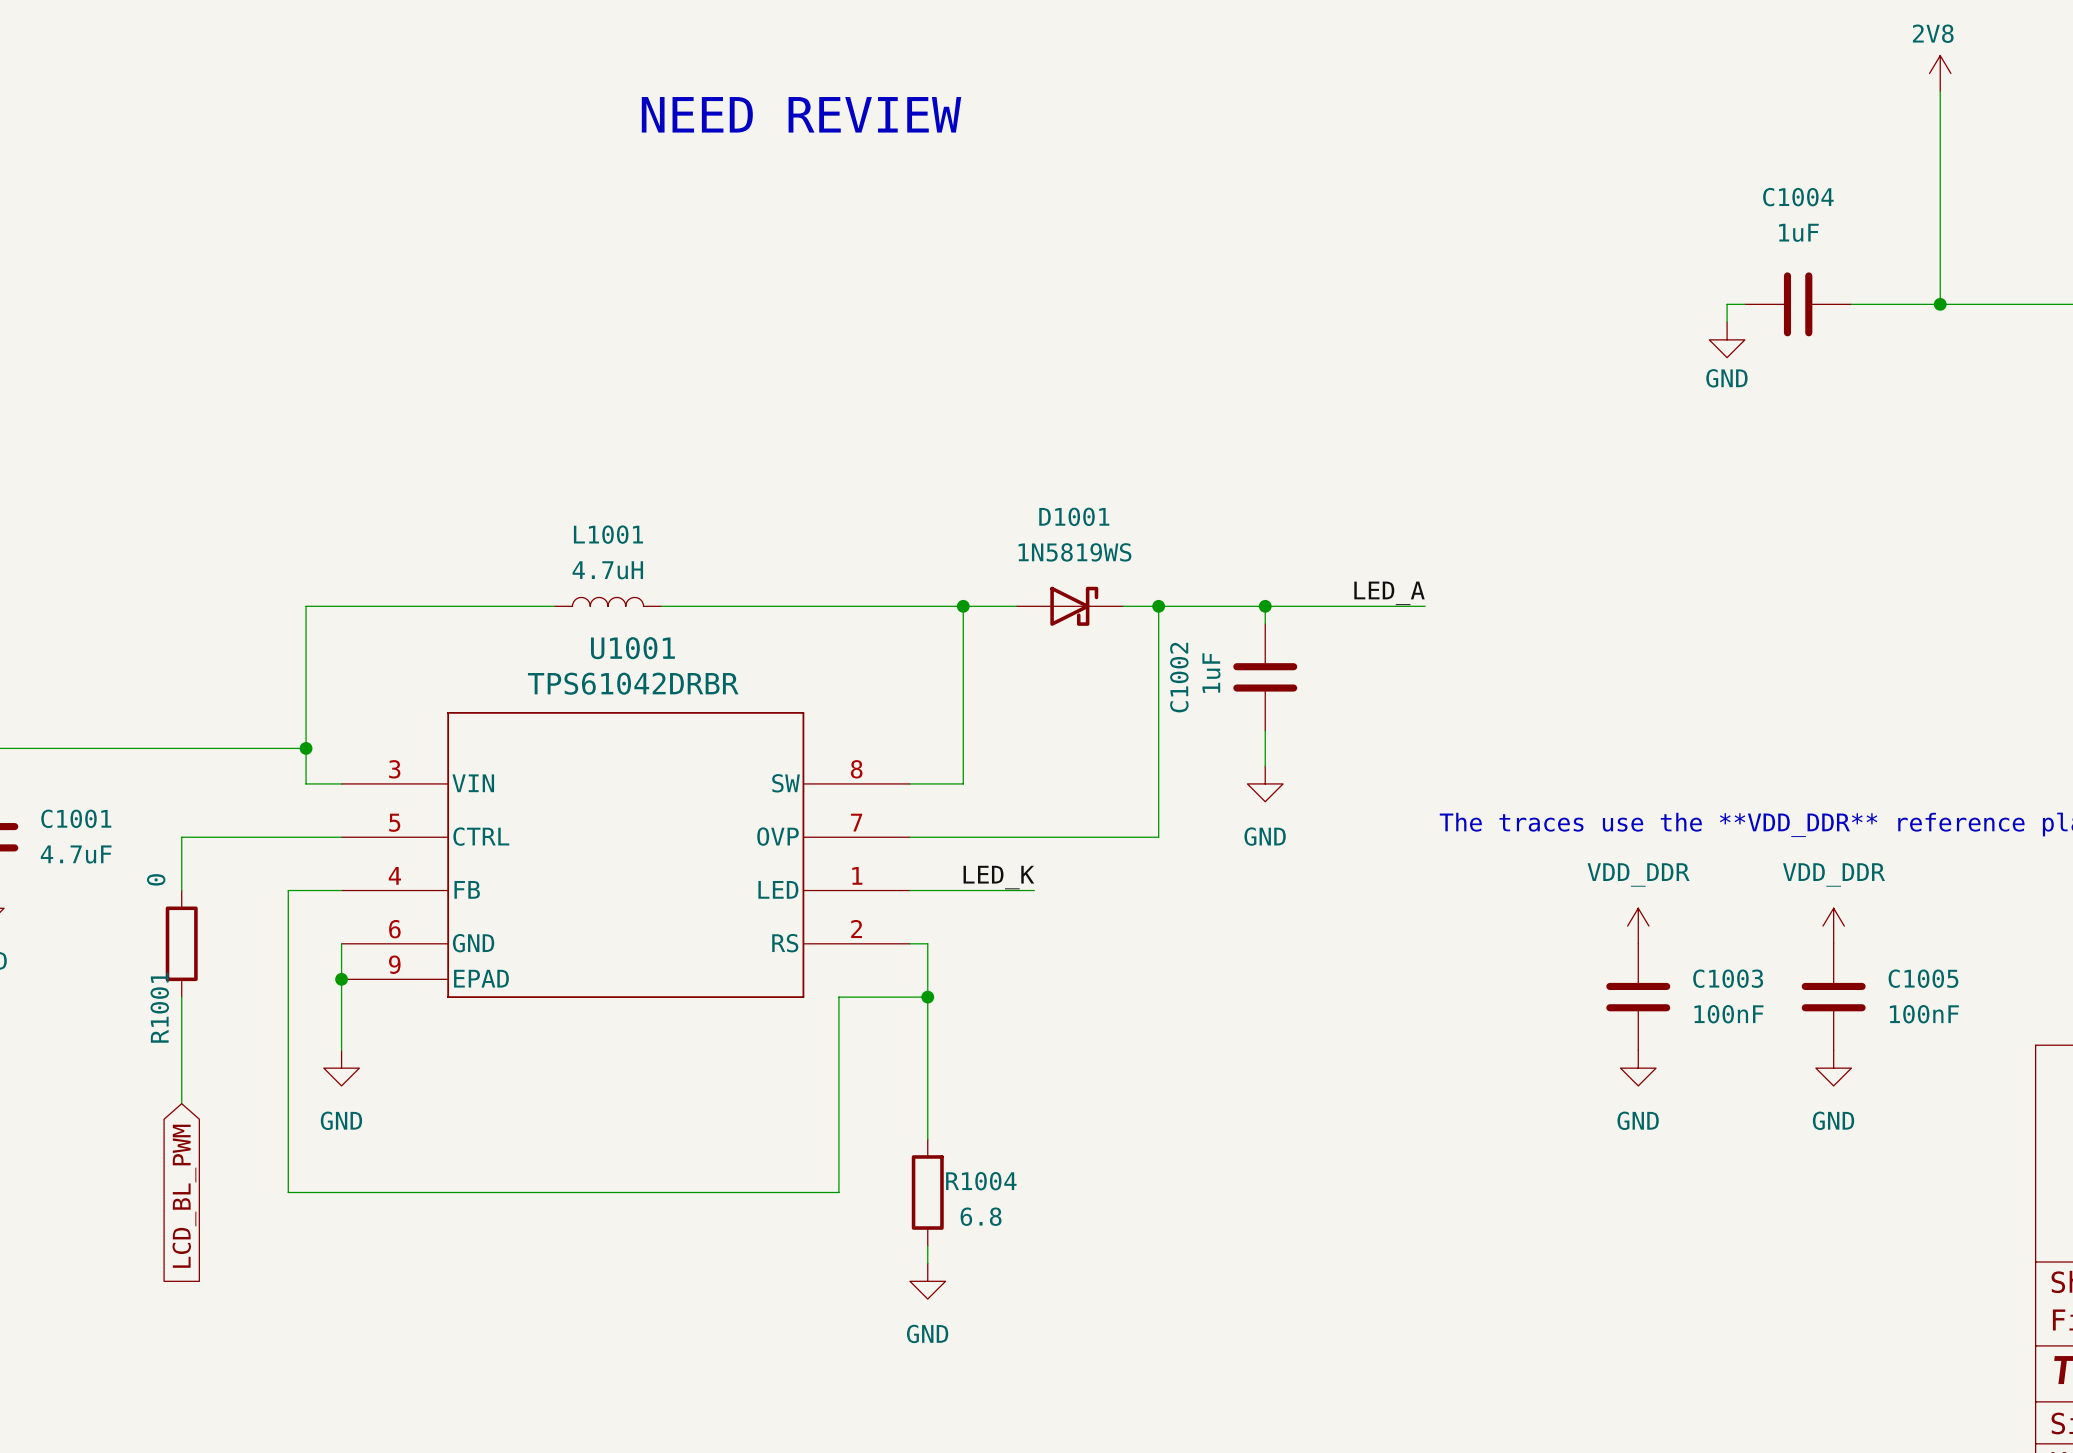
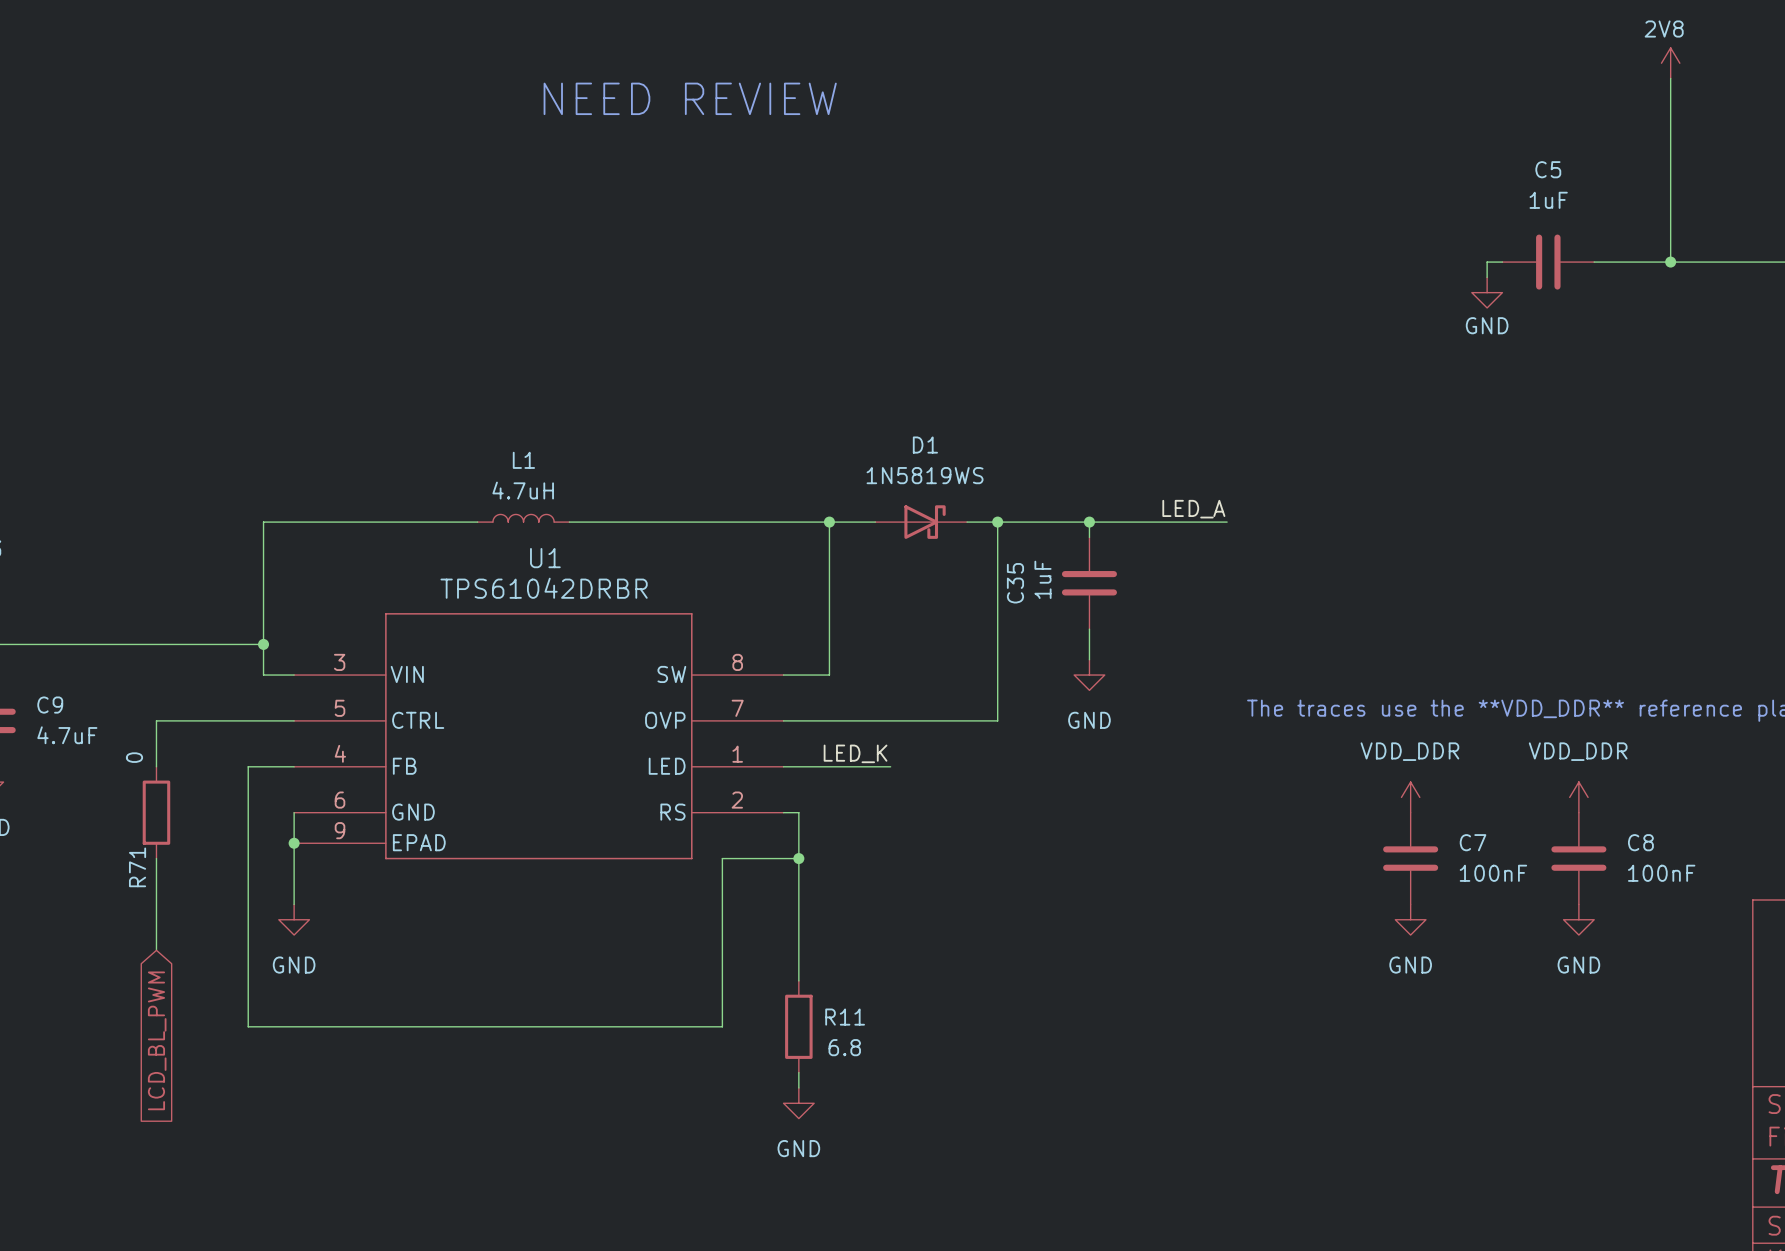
C1004 name: C1004 (1798, 197) -> C5 (1548, 169)
D1001 name: D1001 (1074, 516) -> D1 (925, 445)
L1001 name: L1001 (608, 534) -> L1 (523, 460)
U1001 name: U1001 (632, 648) -> U1 (545, 558)
C1002 name: C1002 (1179, 677) -> C35 (1015, 583)
C1001 name: C1001 (76, 818) -> C9 (50, 705)
C1003 name: C1003 (1728, 978) -> C7 (1473, 842)
C1005 name: C1005 (1923, 978) -> C8 (1640, 842)
R1001 name: R1001 (159, 1007) -> R71 (137, 867)
R1004 name: R1004 (981, 1181) -> R11 (845, 1017)

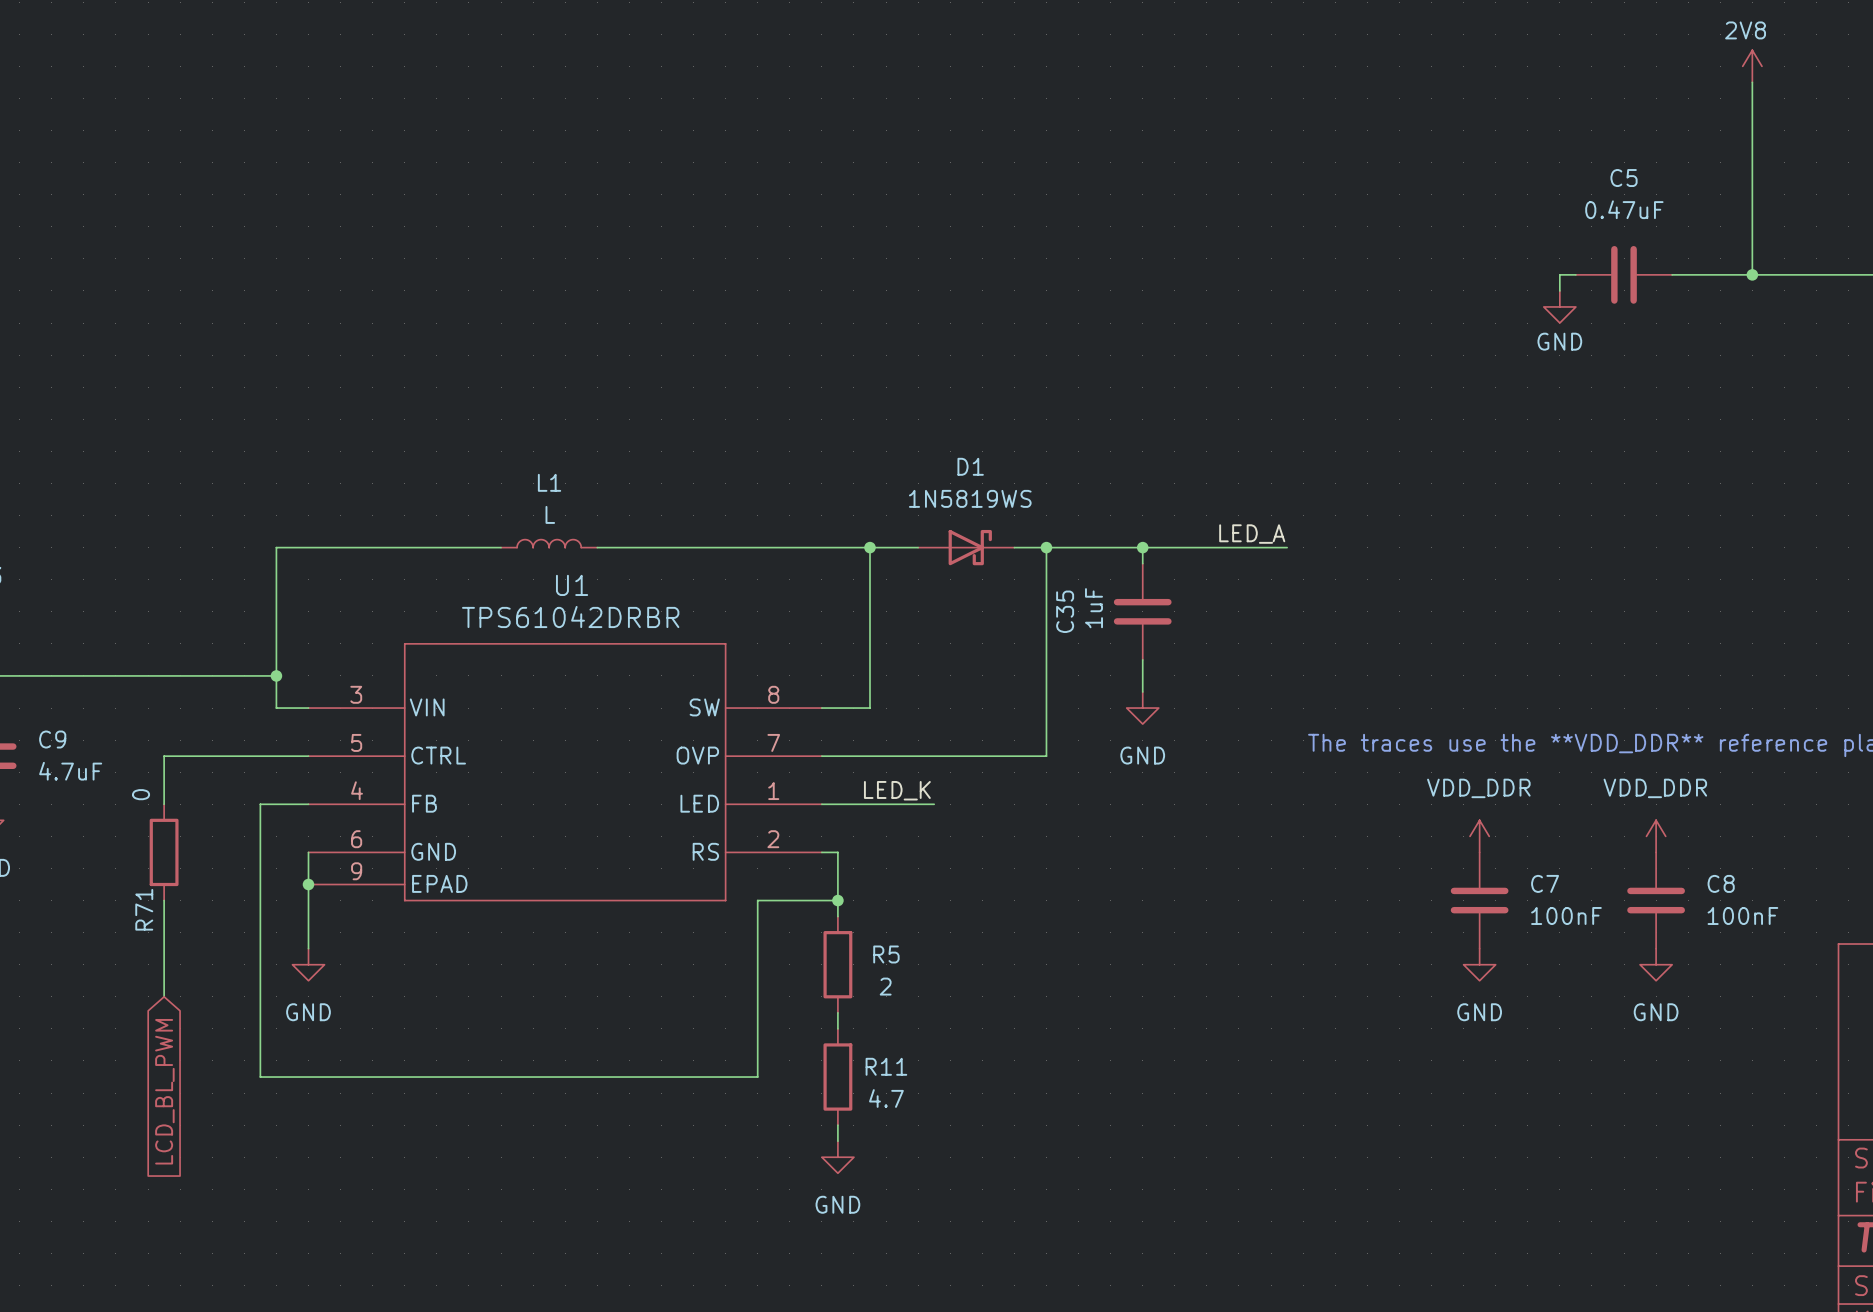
text: NEED REVIEW (690, 98) -> none
C5 value: 1uF (1548, 200) -> 0.47uF (1624, 209)
L1 value: 4.7uH (523, 490) -> L (550, 514)
wire: (798, 873) (798, 965) -> none
R5: none -> 2 (837, 964)
R11 value: 6.8 (844, 1047) -> 4.7 (886, 1098)

